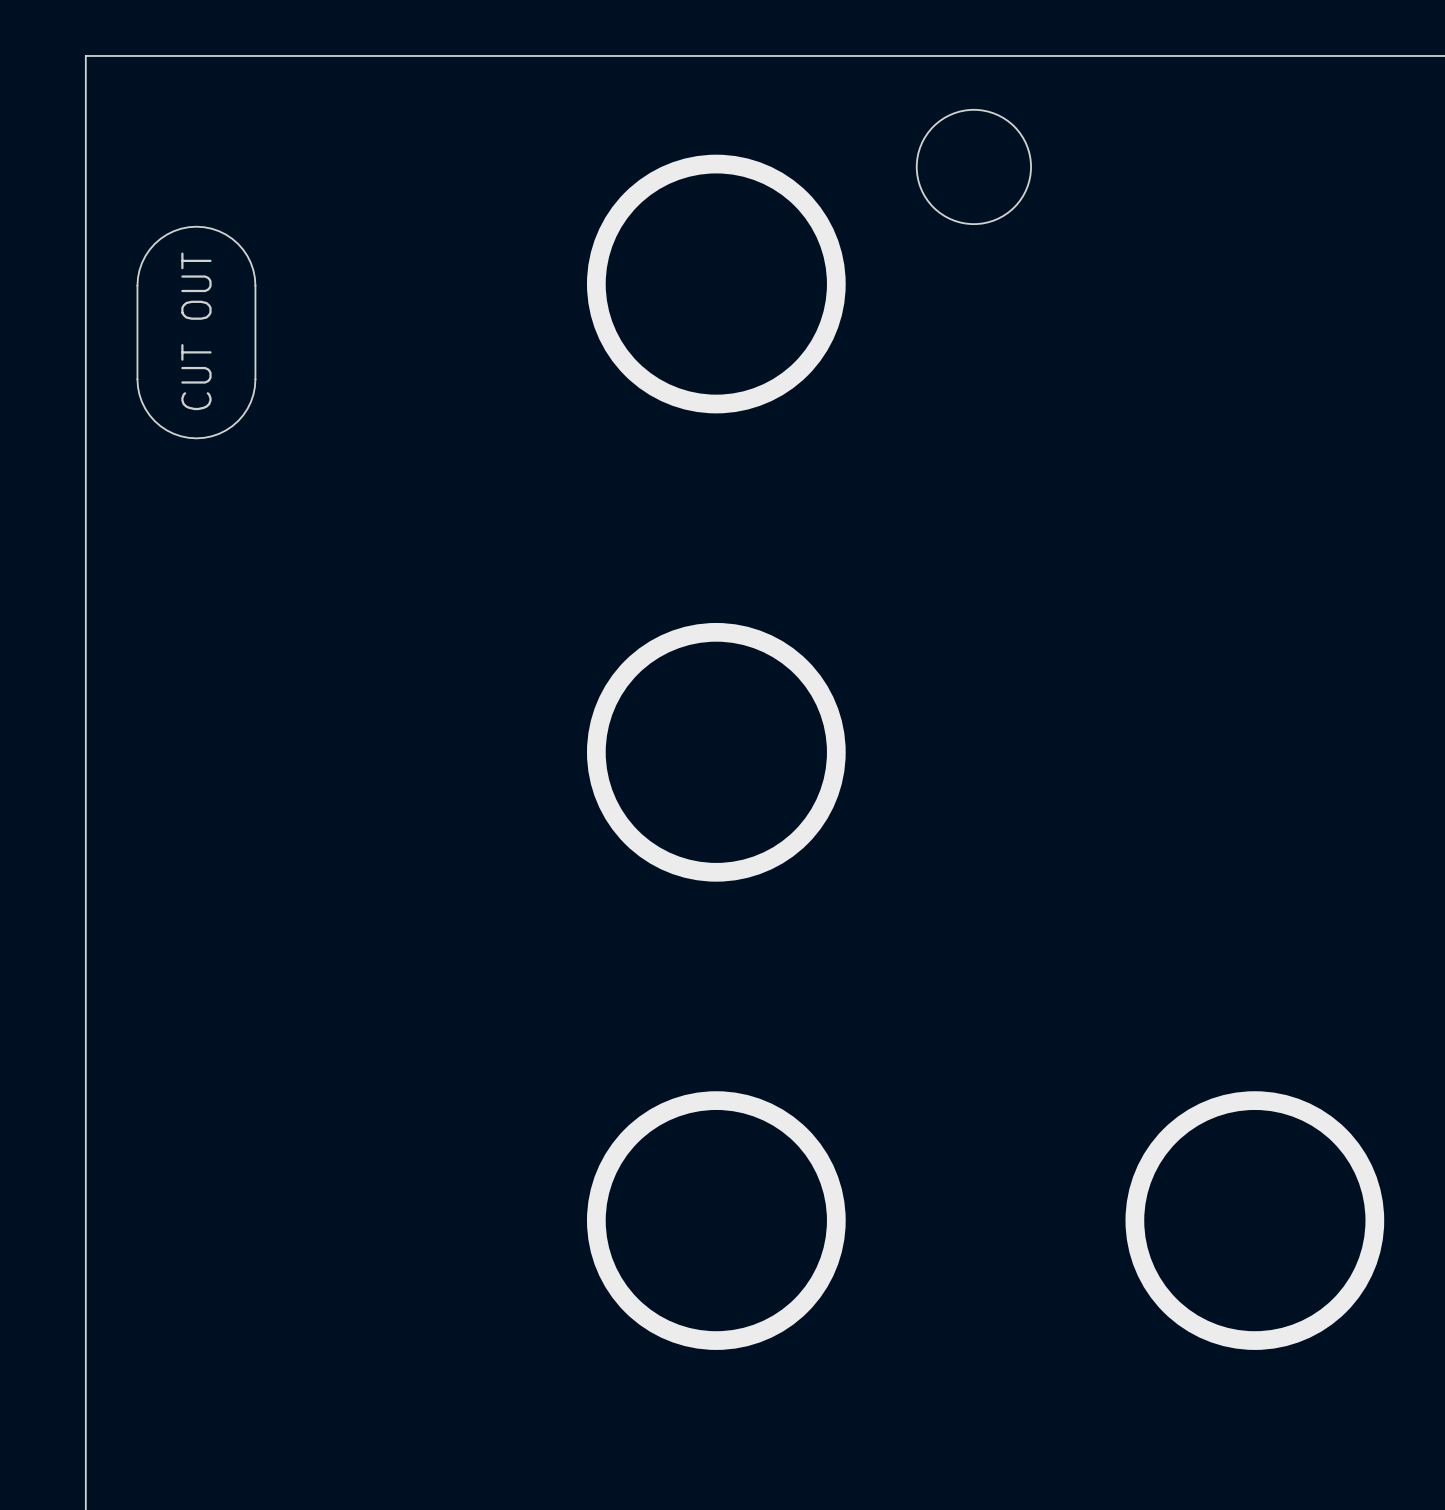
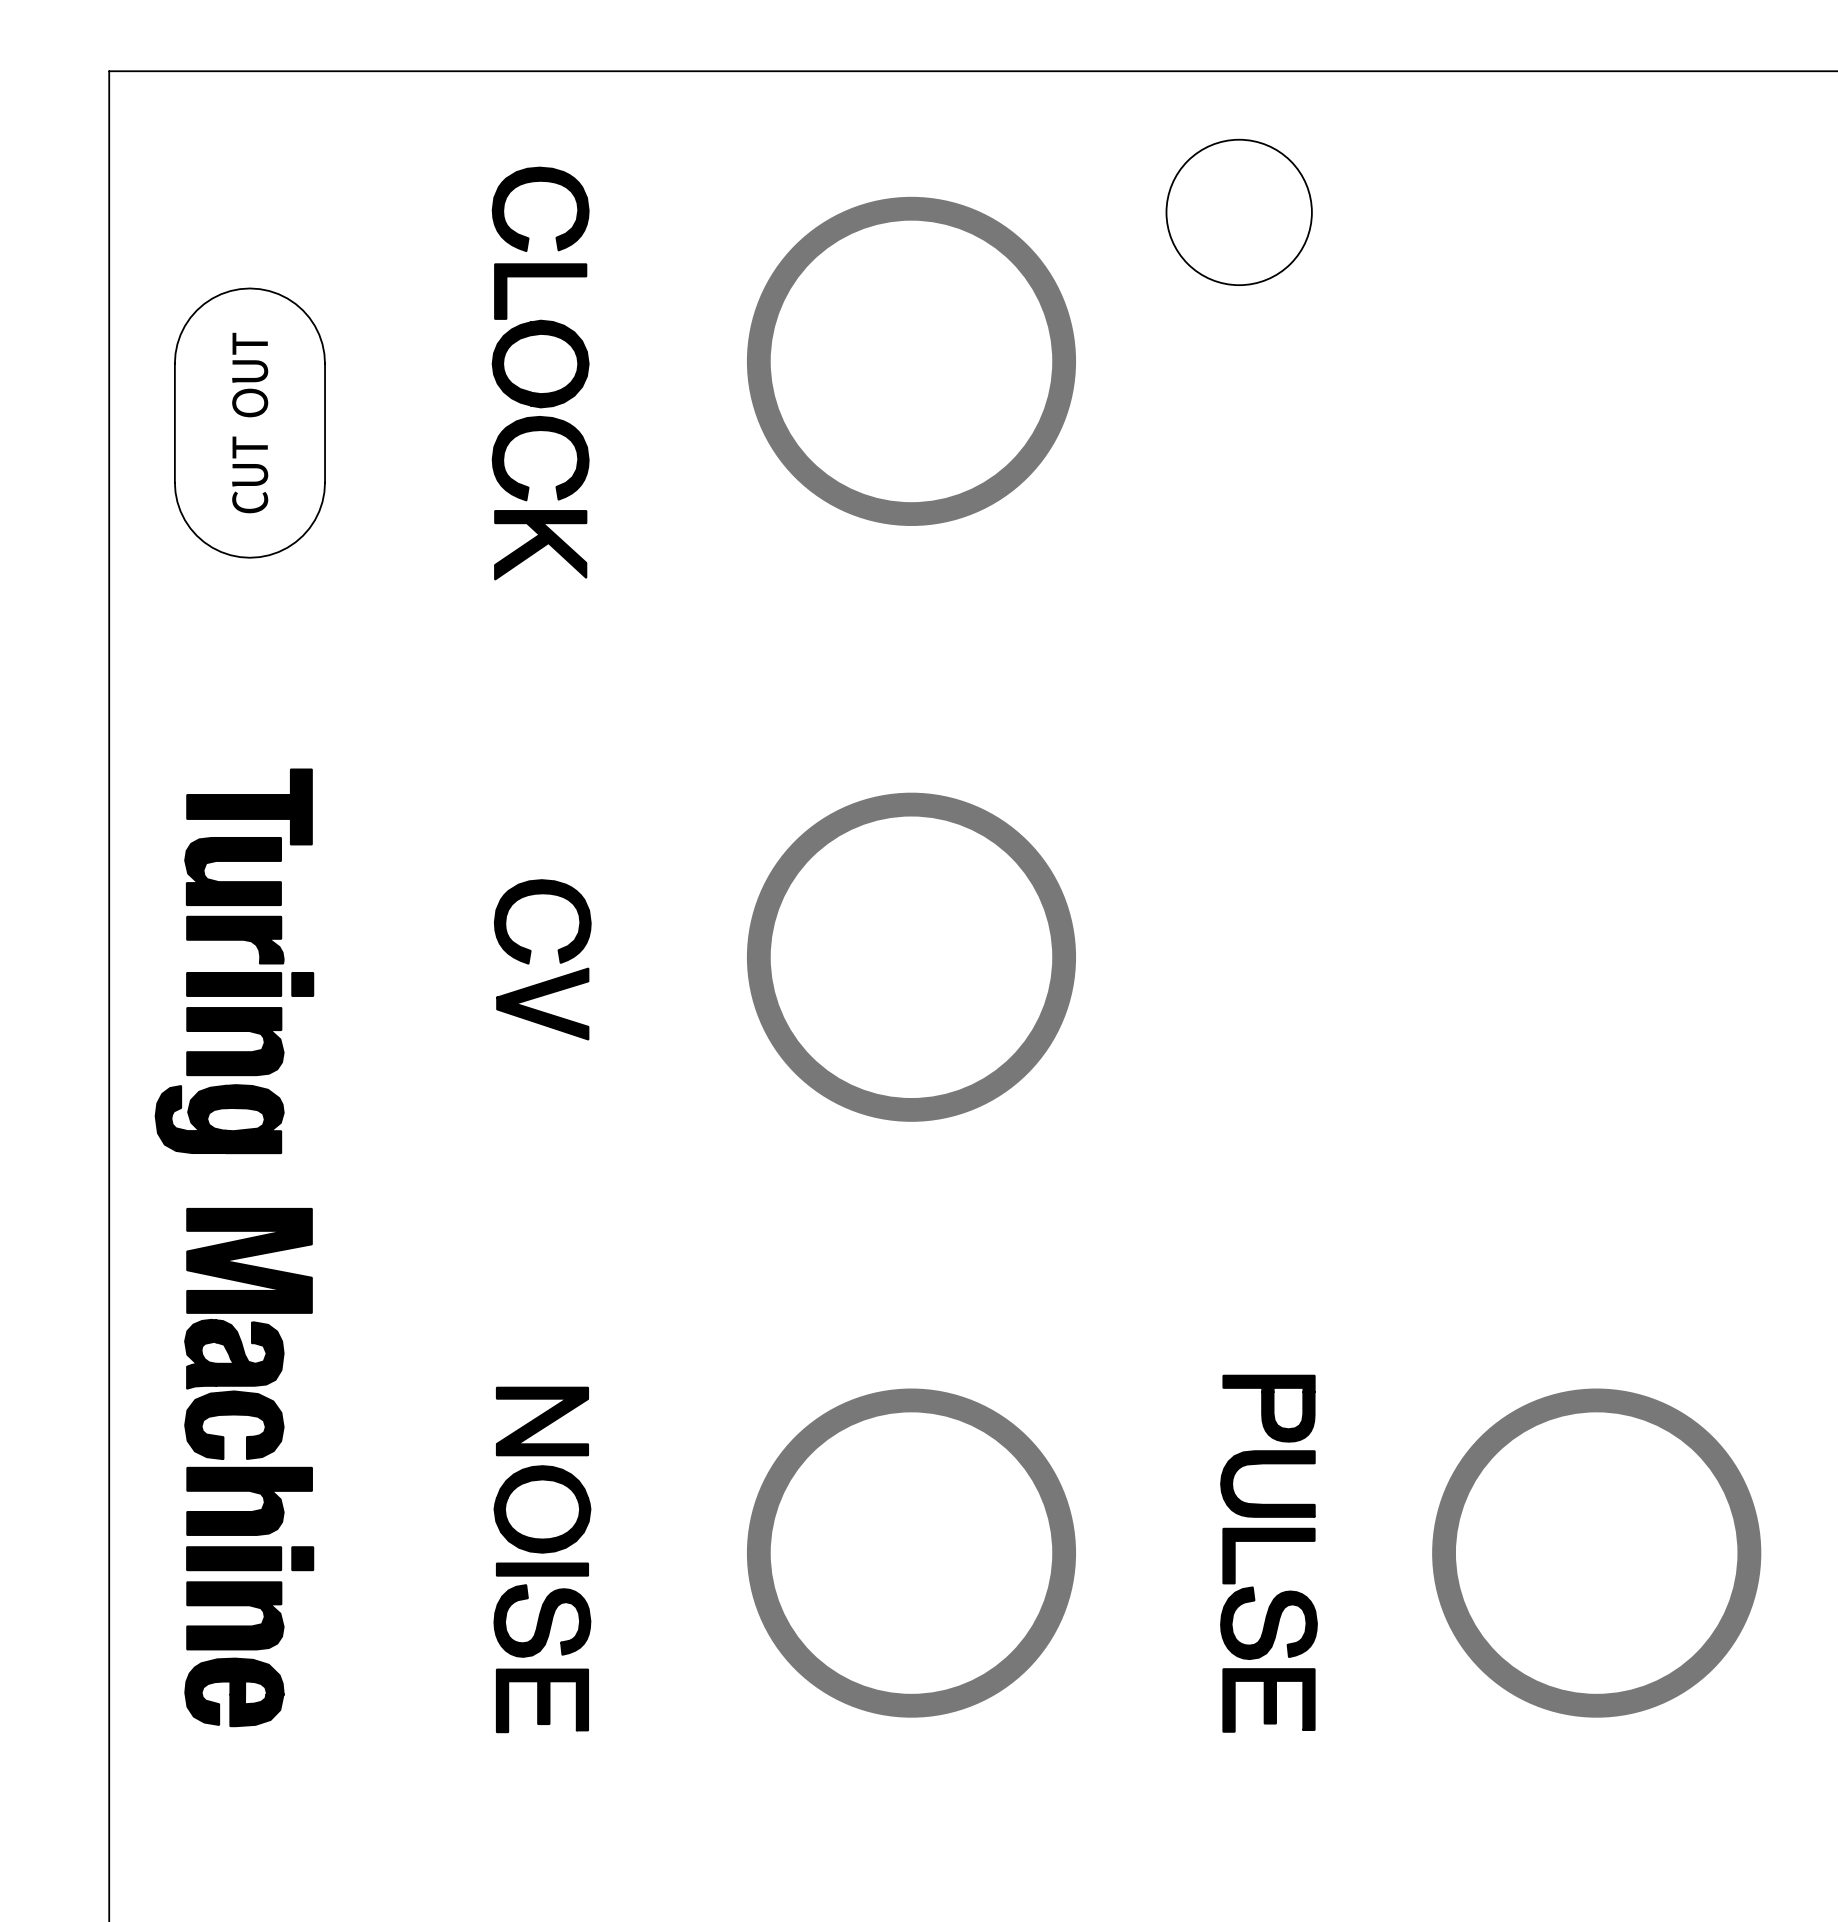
drawing: none -> [491, 166, 590, 581]
drawing: none -> [154, 768, 315, 1728]
drawing: none -> [493, 879, 592, 1041]
drawing: none -> [1220, 1374, 1318, 1733]
drawing: none -> [493, 1386, 592, 1734]

